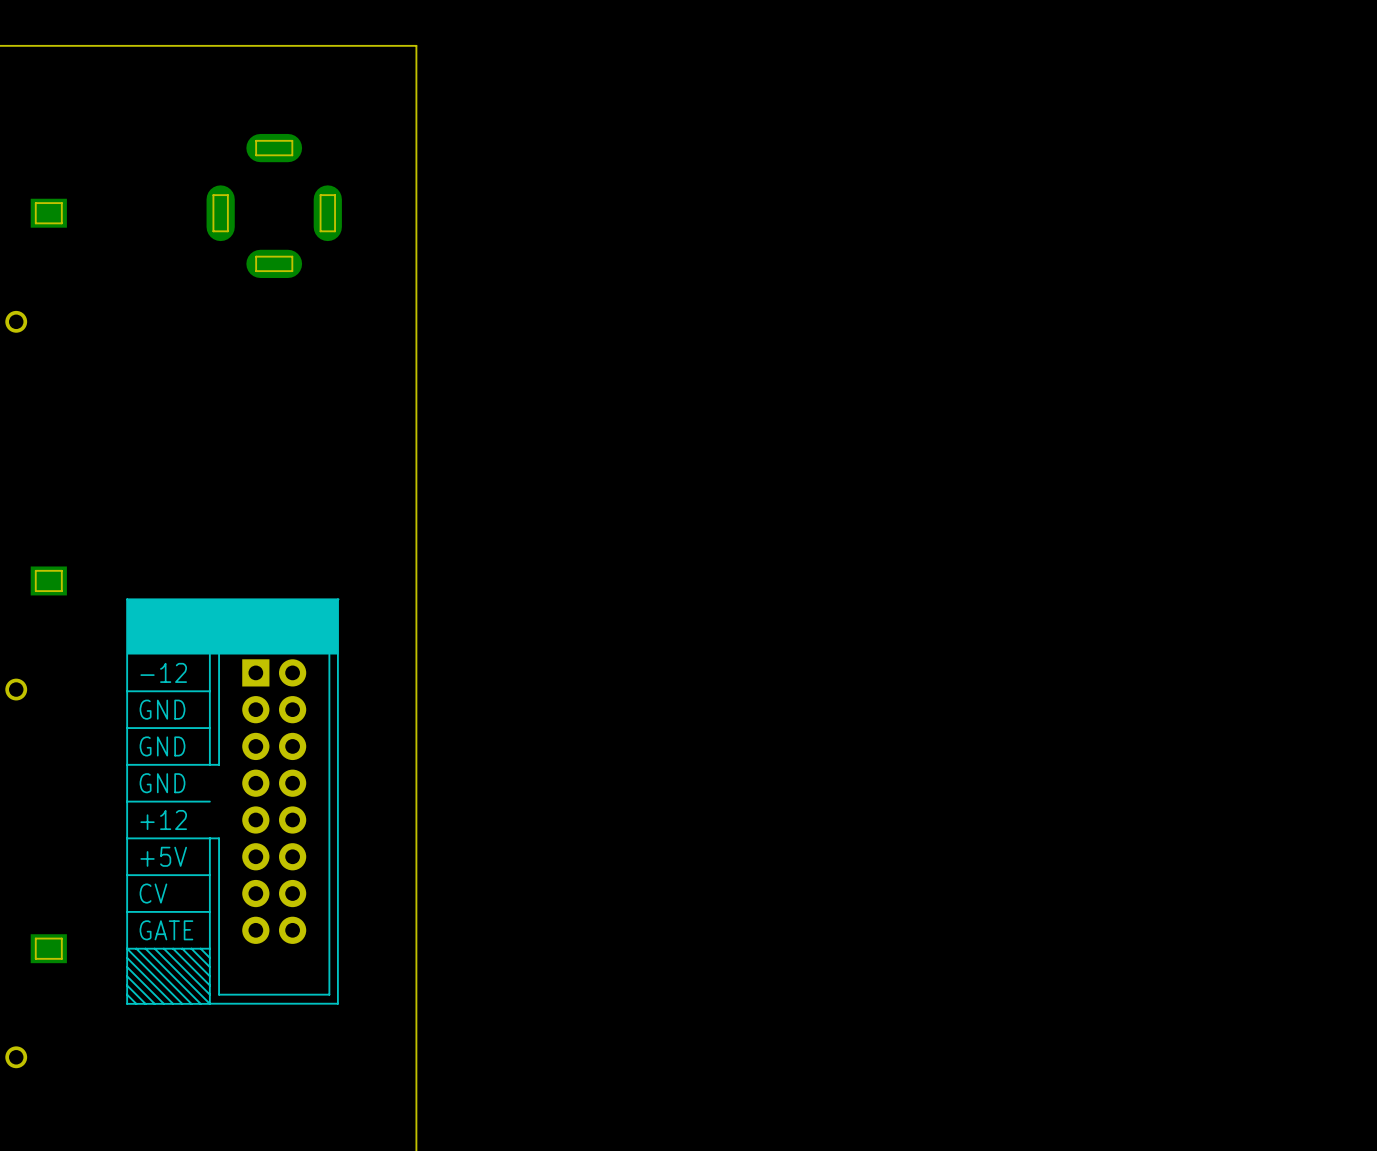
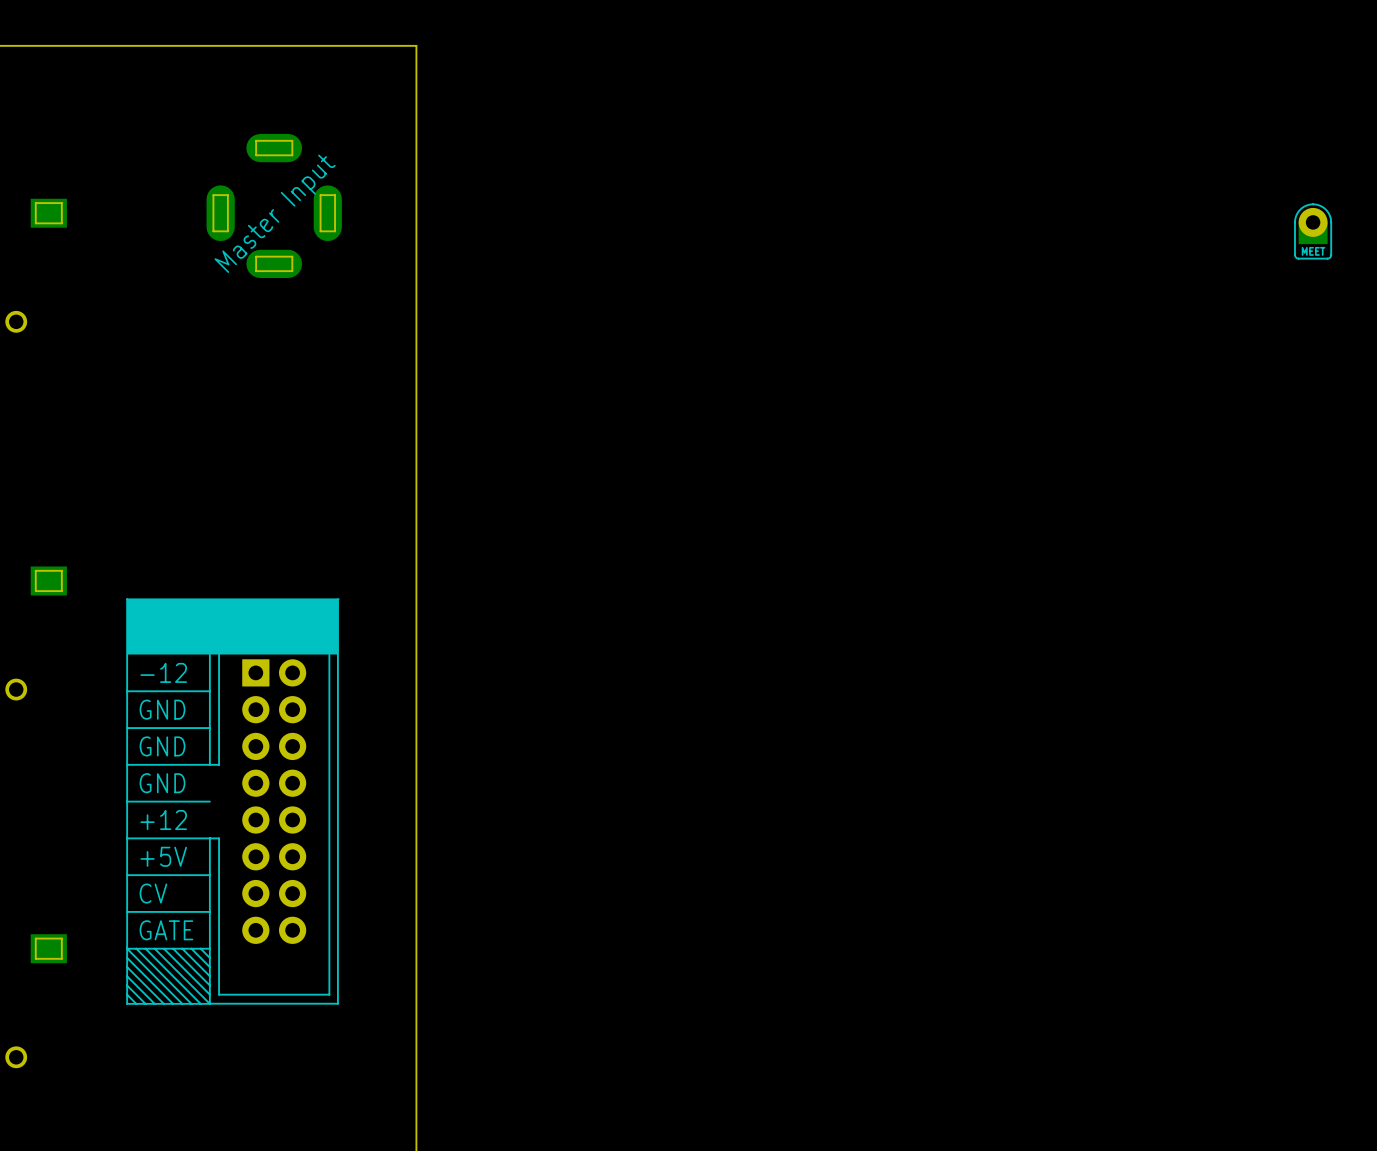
part text: none -> Master Input (275, 213)
part: none -> (1313, 231)

